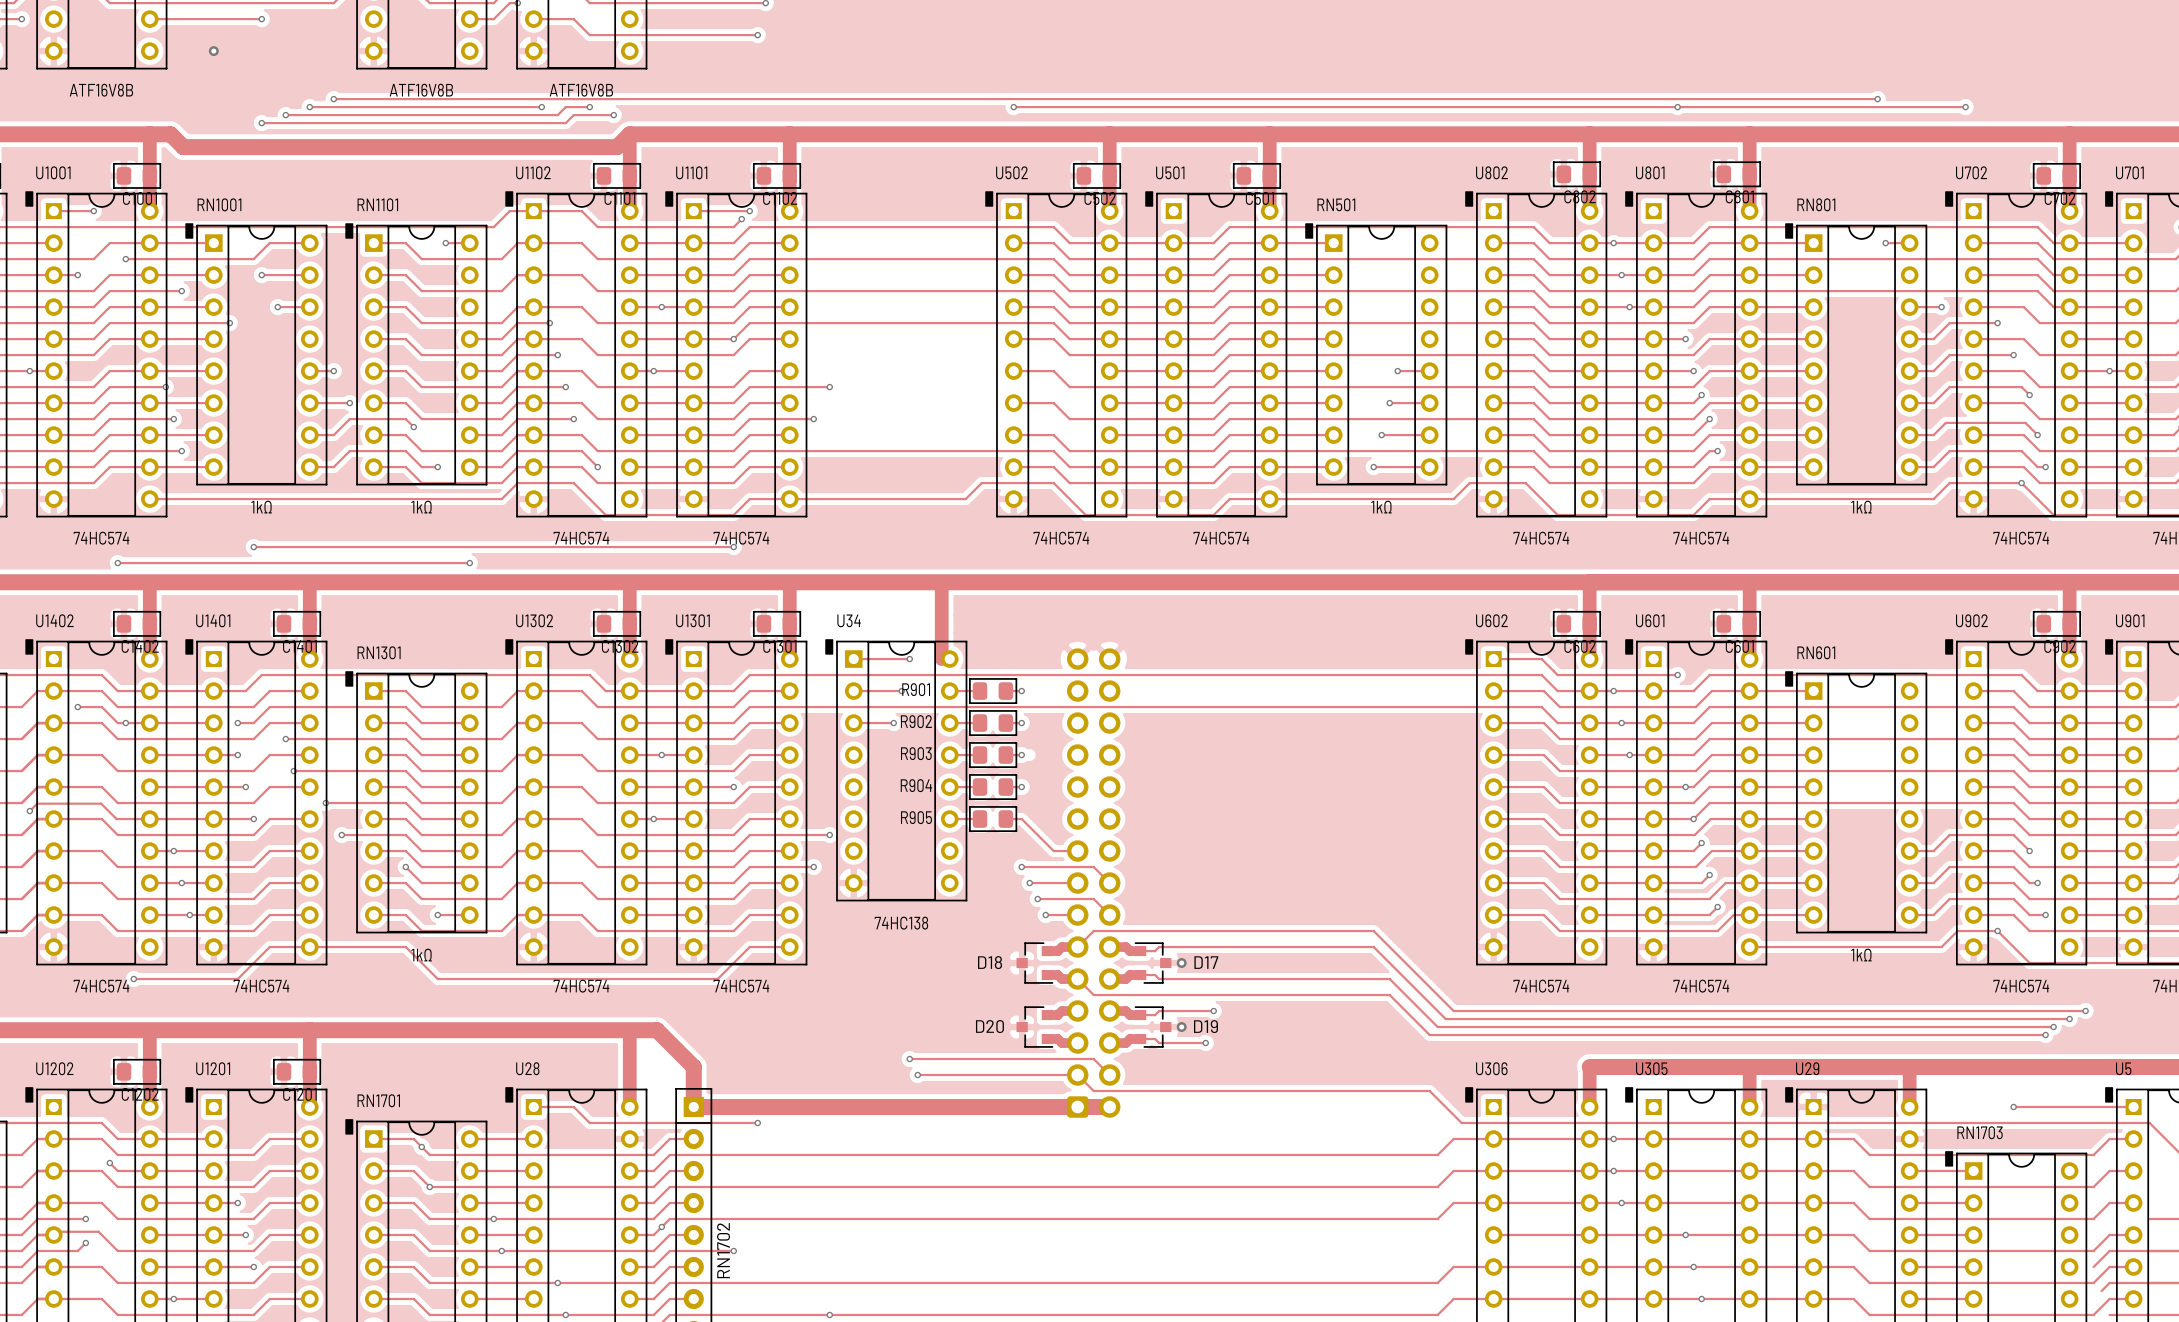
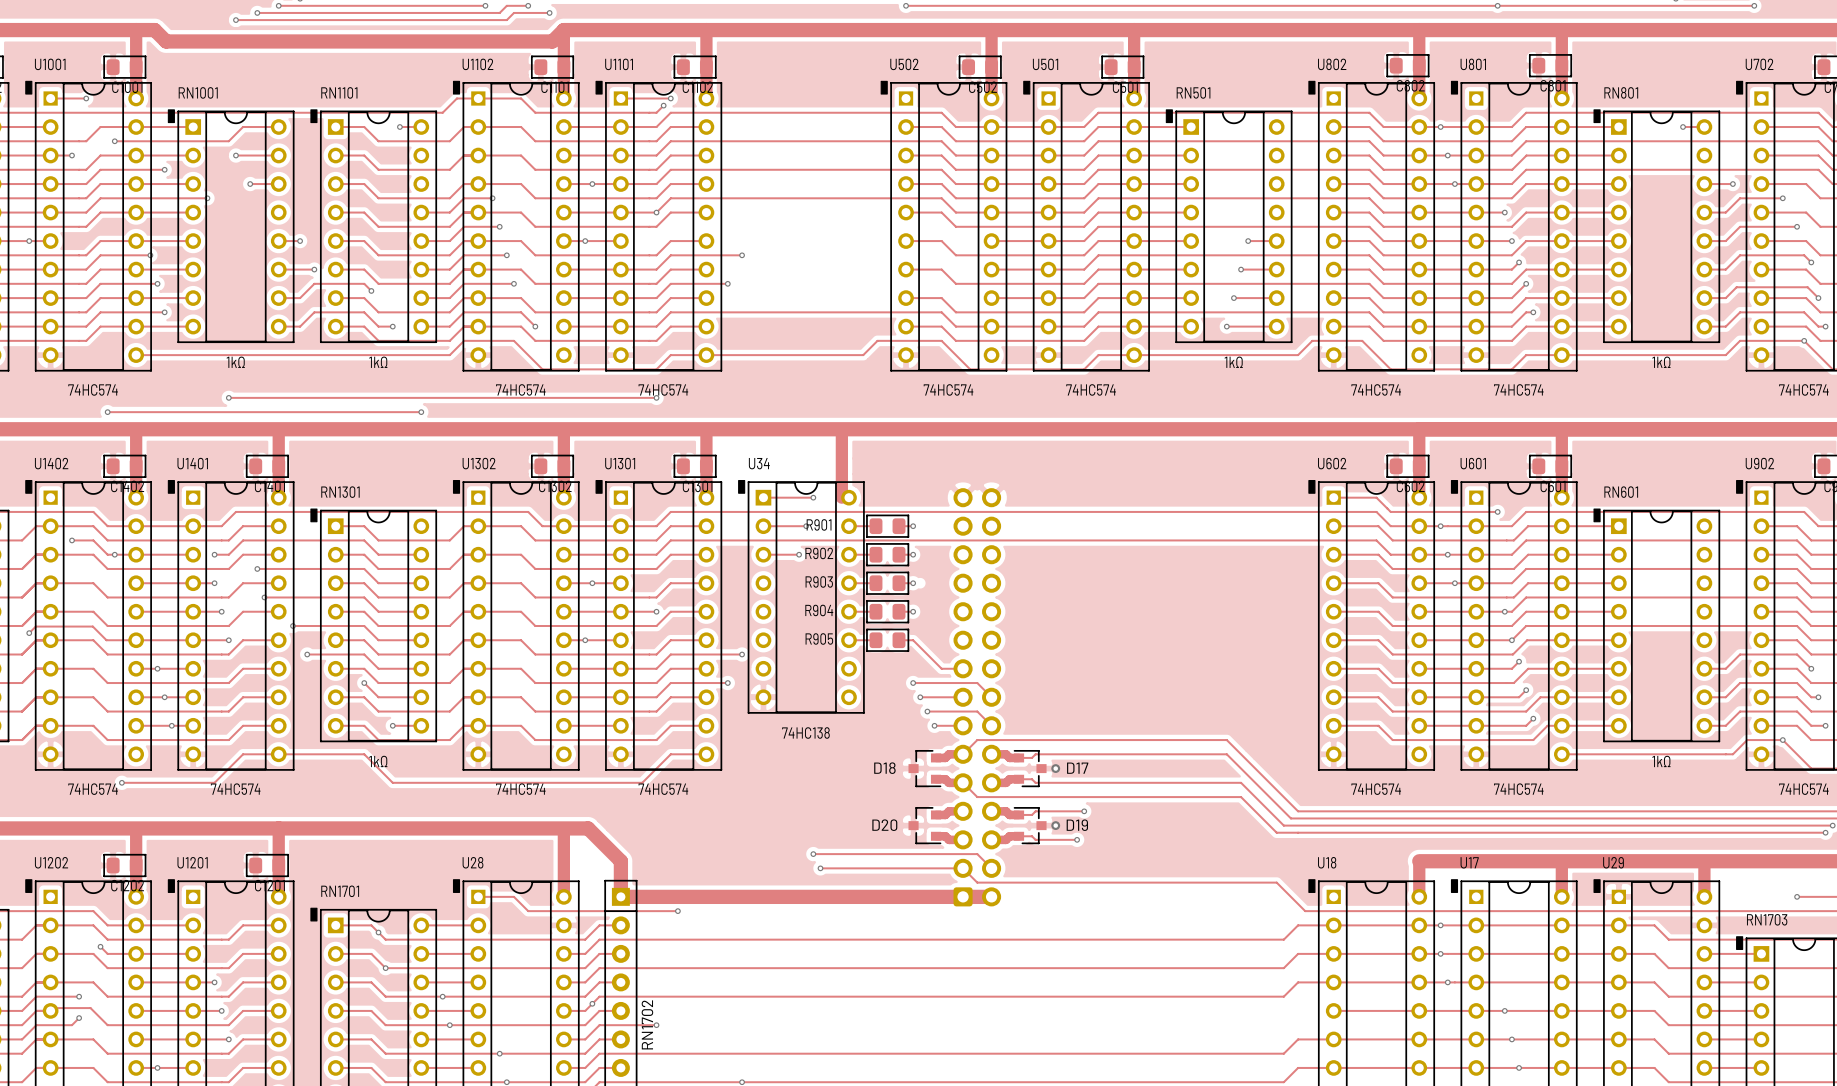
U306 name: U306 (1491, 1068) -> U18 (1327, 862)
U305 name: U305 (1651, 1068) -> U17 (1469, 862)

